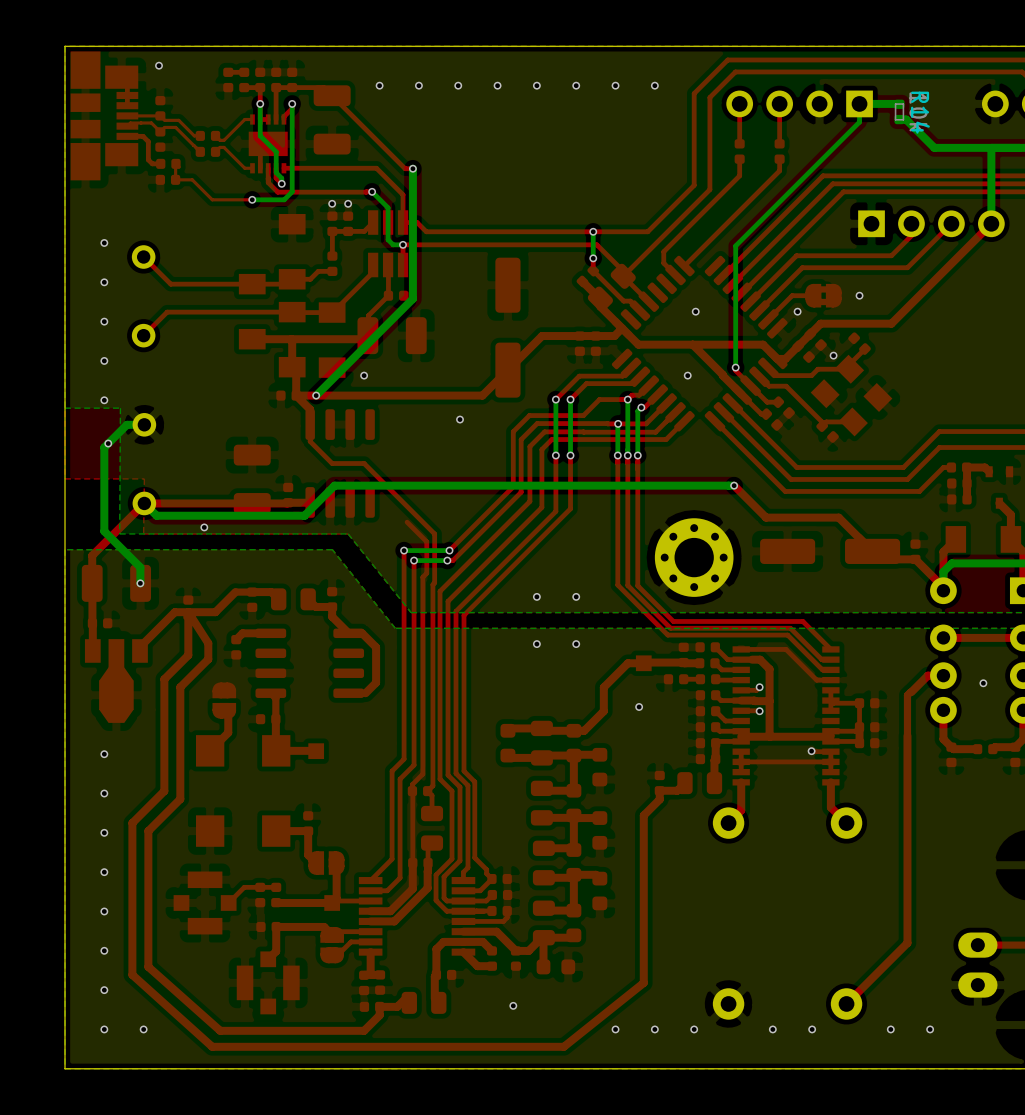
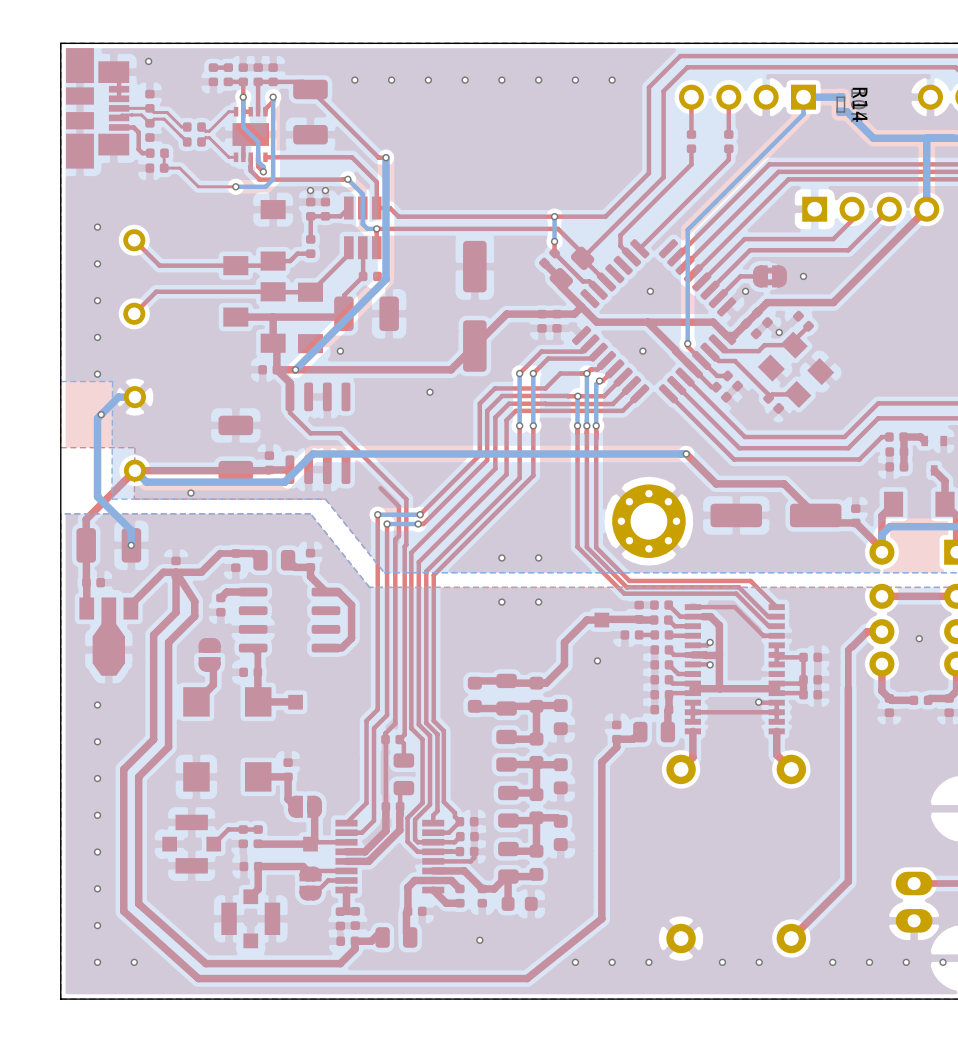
via: none -> (906, 962)
via: none -> (943, 962)

